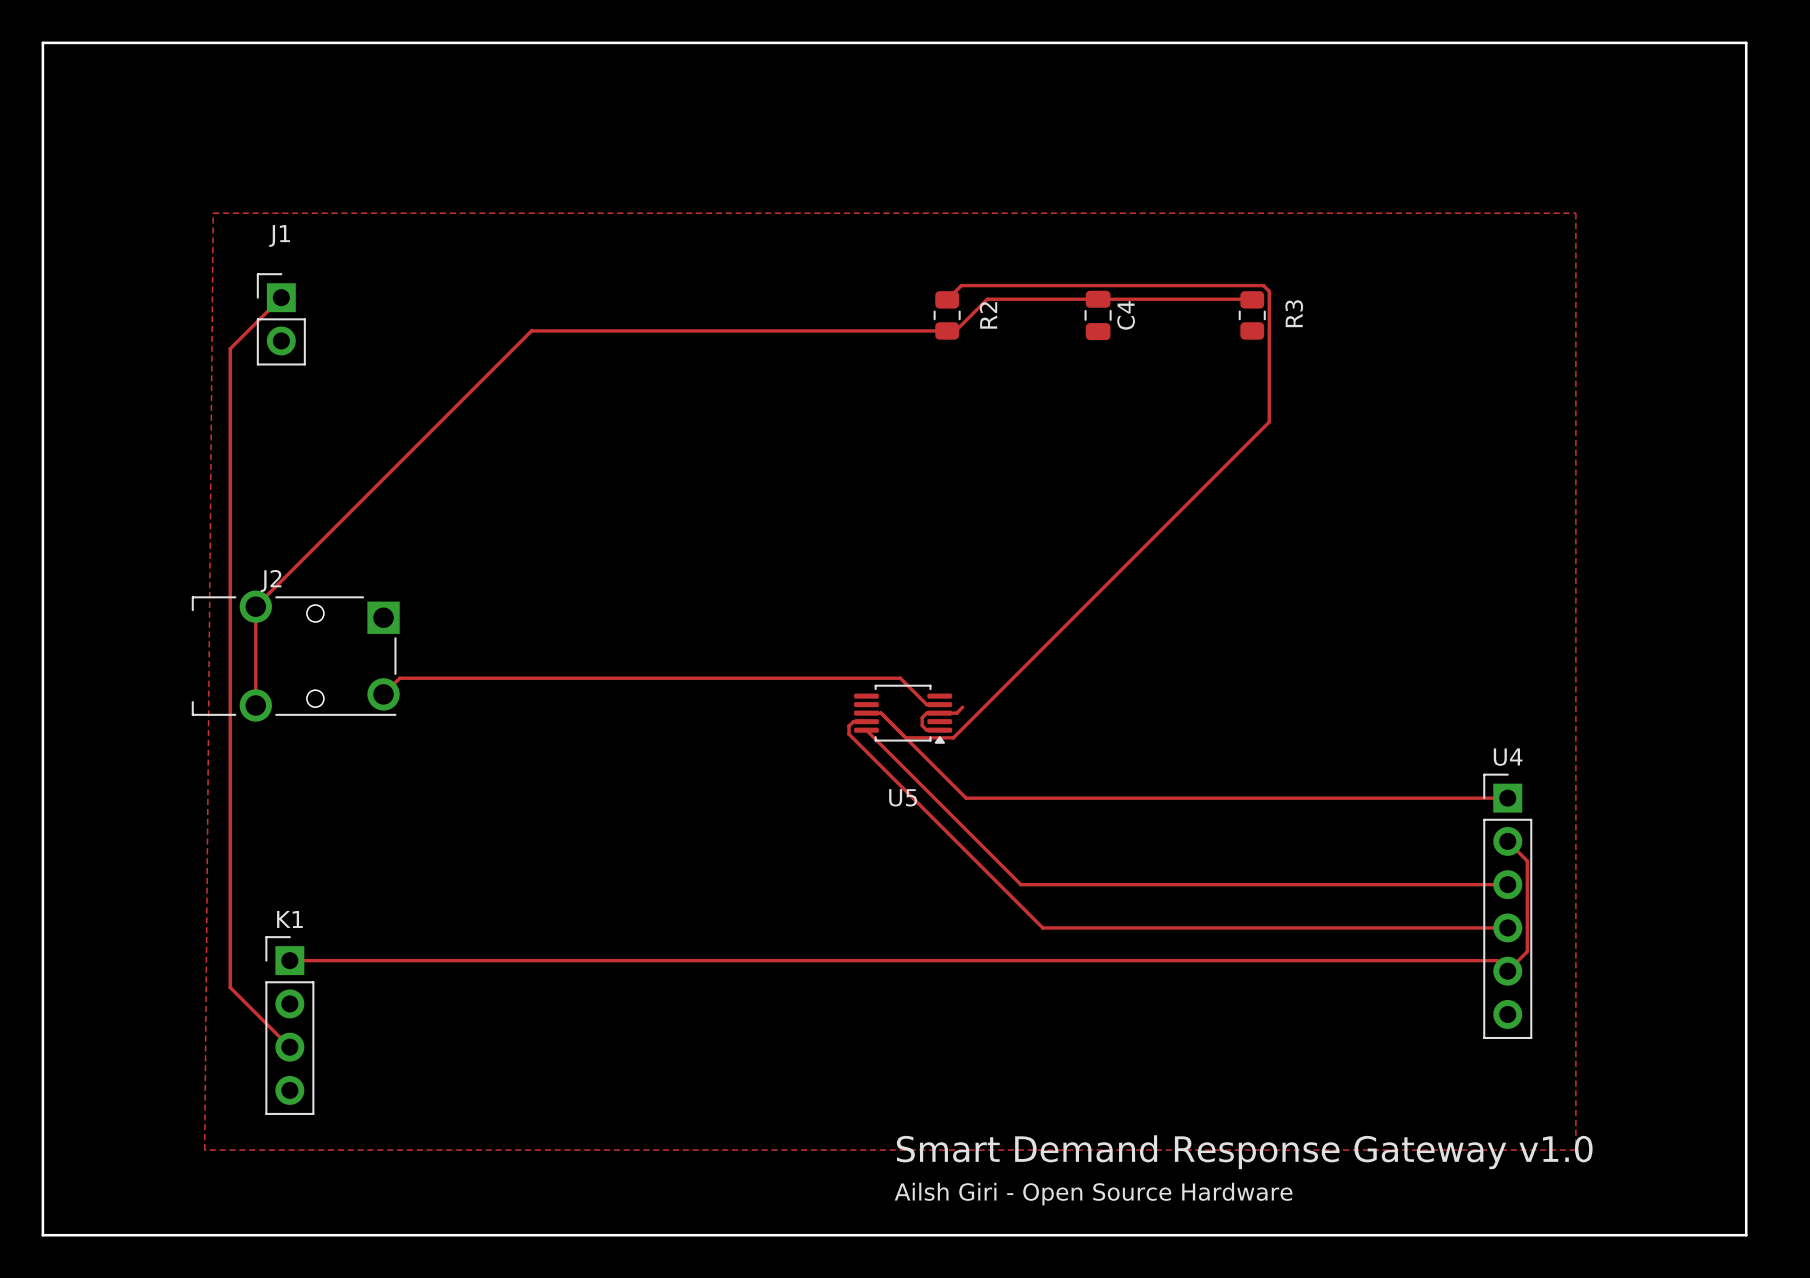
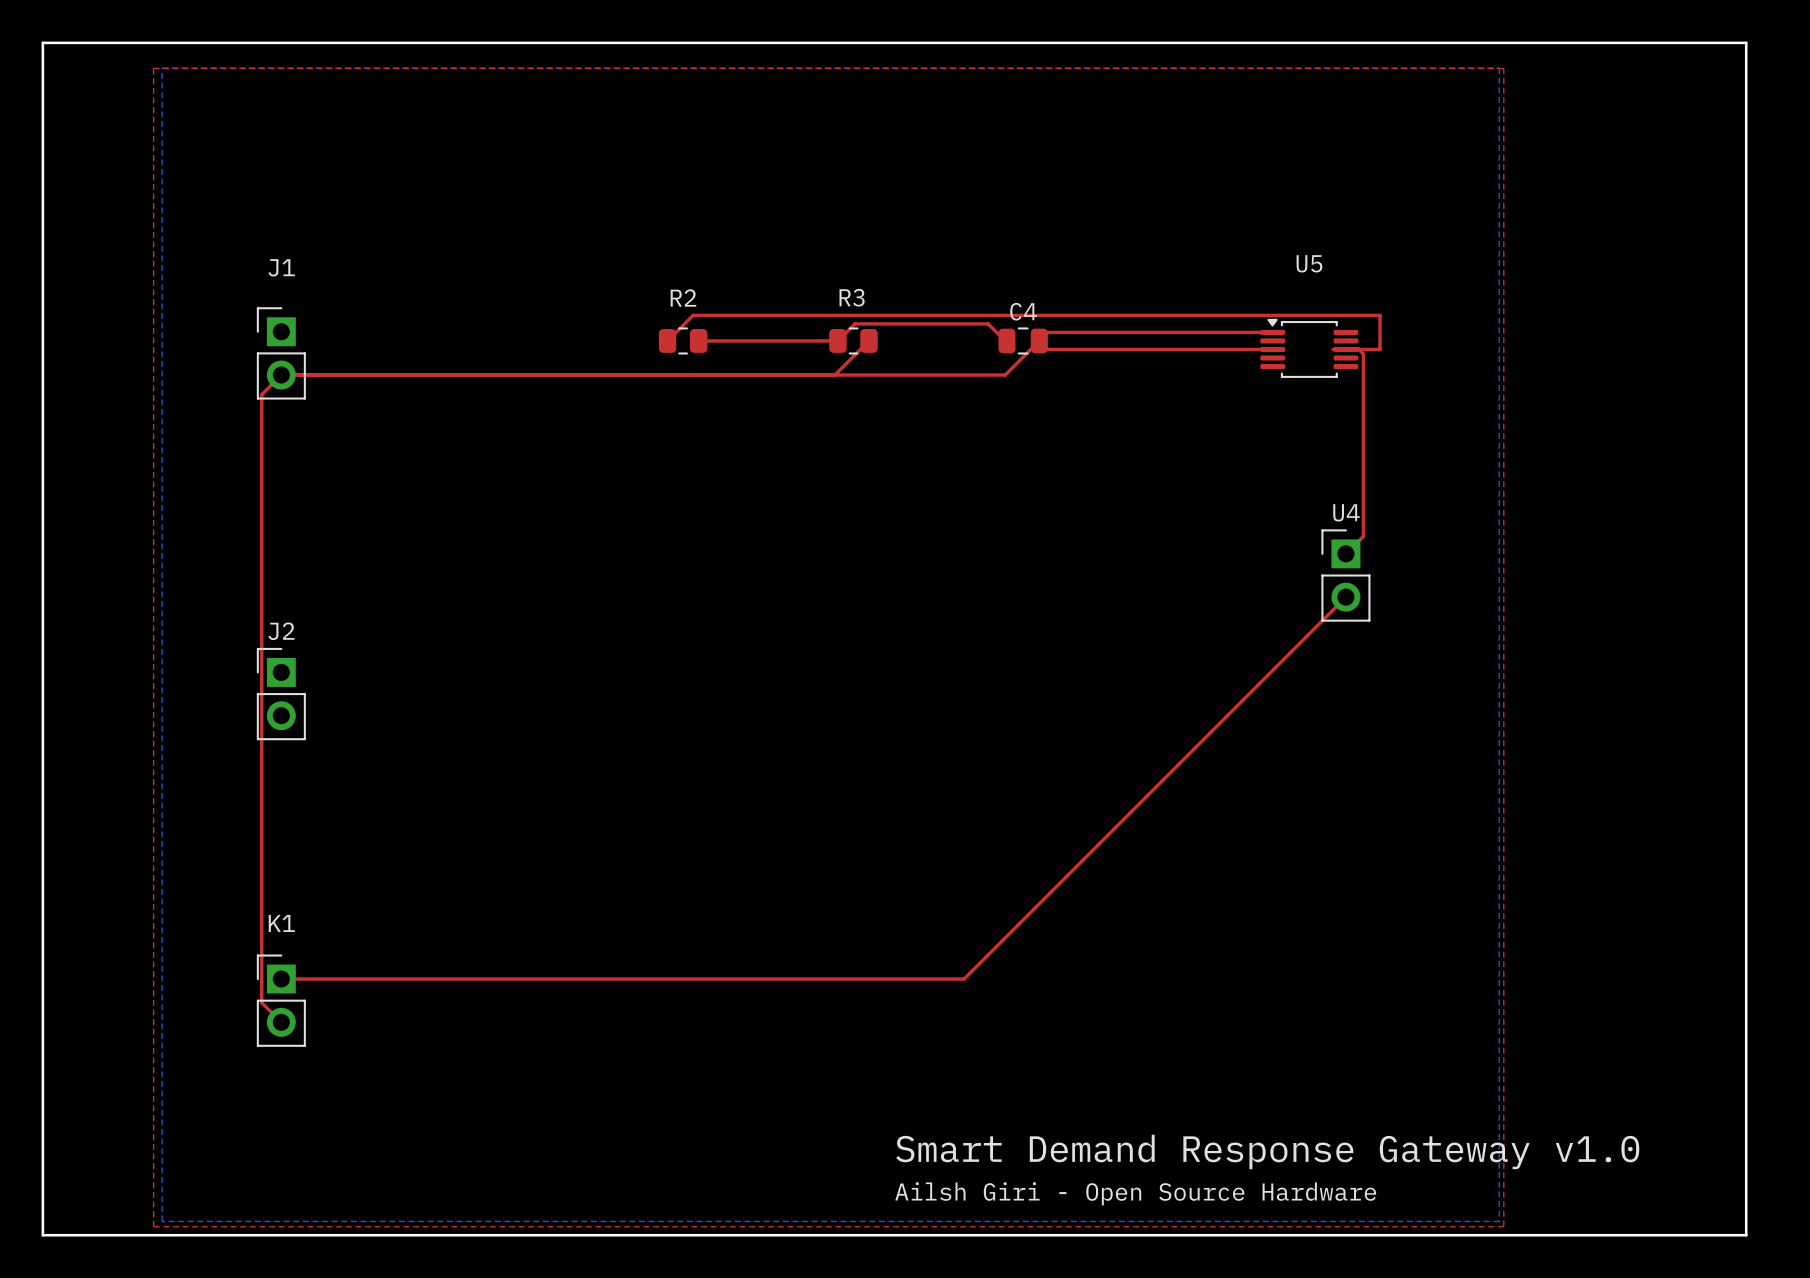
bottom zone outline: none -> (162, 68) (1499, 68) (1499, 1221) (162, 1221) (162, 68)
top zone outline: (213, 213) (204, 1150) (1575, 1150) (1575, 213) (213, 213) -> (153, 68) (153, 1226) (1503, 1226) (1503, 68) (153, 68)
top track: (281, 297) (230, 348) (230, 987) (289, 1047) -> none
top track: (947, 299) (961, 285) (1263, 285) (1269, 291) (1269, 421) (953, 737) (905, 737) -> none
top track: (1252, 299) (987, 299) (955, 330) (531, 330) (255, 606) (255, 705) -> none
R3 name position: R3 (1294, 313) -> R3 (852, 297)
R2 rotation: 0° (947, 315) -> 90° clockwise (683, 340)
R2 position: (947, 315) -> (683, 340)
R2 name position: R2 (988, 315) -> R2 (683, 298)
C4 rotation: 0° (1098, 315) -> 90° clockwise (1023, 340)
C4 position: (1098, 315) -> (1023, 340)
C4 name position: C4 (1126, 315) -> C4 (1023, 311)
R3 rotation: 0° (1252, 315) -> 90° clockwise (853, 340)
R3 position: (1252, 315) -> (853, 340)
J1 position: (281, 319) -> (281, 353)
top track: none -> (1272, 332) (1047, 332) (1005, 375) (281, 375) (261, 394) (261, 1002) (281, 1022)
top track: none -> (667, 340) (693, 315) (1380, 315) (1380, 349) (1333, 349)
top track: none -> (698, 340) (837, 340) (854, 323) (988, 323) (1006, 340)
top track: none -> (869, 340) (834, 375)
top track: none -> (1039, 340) (1047, 349) (1272, 349)
top track: none -> (1354, 348) (1357, 348) (1363, 354) (1363, 536) (1345, 553)
J2 footprint: [191, 590, 400, 722] -> [256, 647, 306, 741]
top track: none -> (1345, 597) (964, 979) (281, 979)
top track: (383, 694) (399, 678) (900, 678) (926, 704) (939, 704) -> none
top track: (962, 707) (956, 713) (926, 713) (922, 717) (922, 725) (926, 730) (939, 730) -> none
top track: (866, 713) (881, 713) (966, 798) (1507, 798) -> none
U5 rotation: 0° (903, 714) -> 180° (1309, 348)
U5 position: (903, 714) -> (1309, 348)
top track: (866, 721) (853, 721) (848, 726) (848, 734) (1042, 927) (1507, 927) -> none
top track: (866, 730) (1020, 884) (1507, 884) -> none
U4 name position: U4 (1508, 757) -> U4 (1346, 512)
U4 footprint: [1483, 773, 1533, 1039] -> [1321, 529, 1371, 622]
top track: (1507, 841) (1527, 860) (1527, 951) (1507, 971) (1497, 960) (289, 960) -> none
K1 footprint: [265, 936, 315, 1115] -> [256, 954, 306, 1047]

